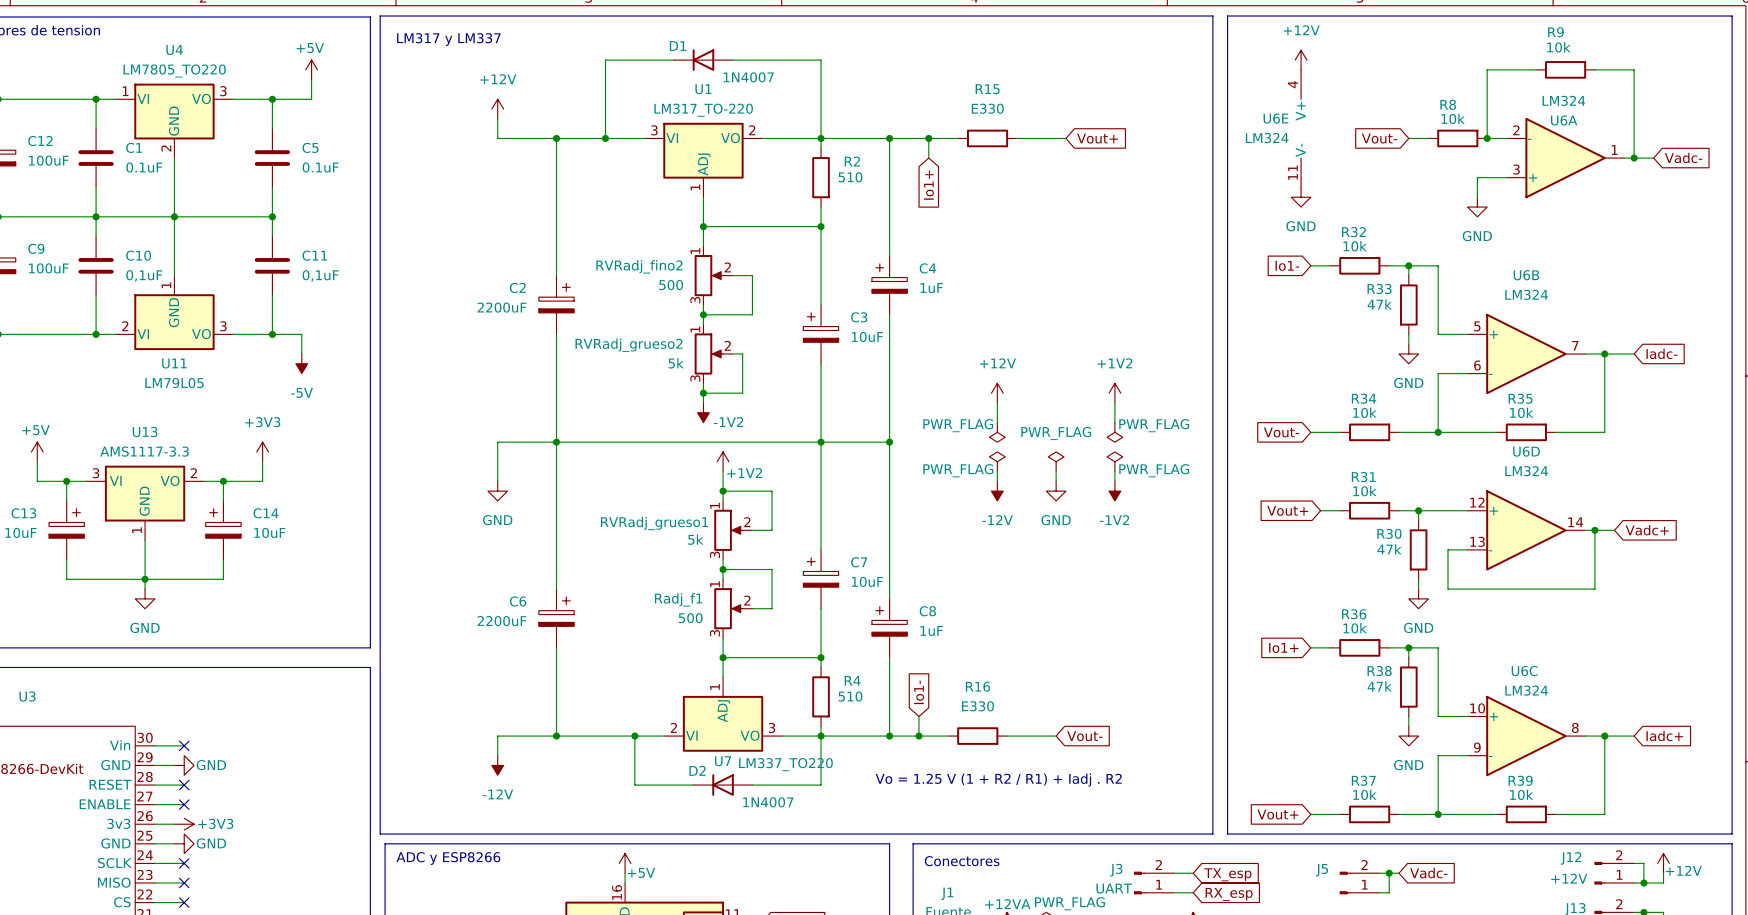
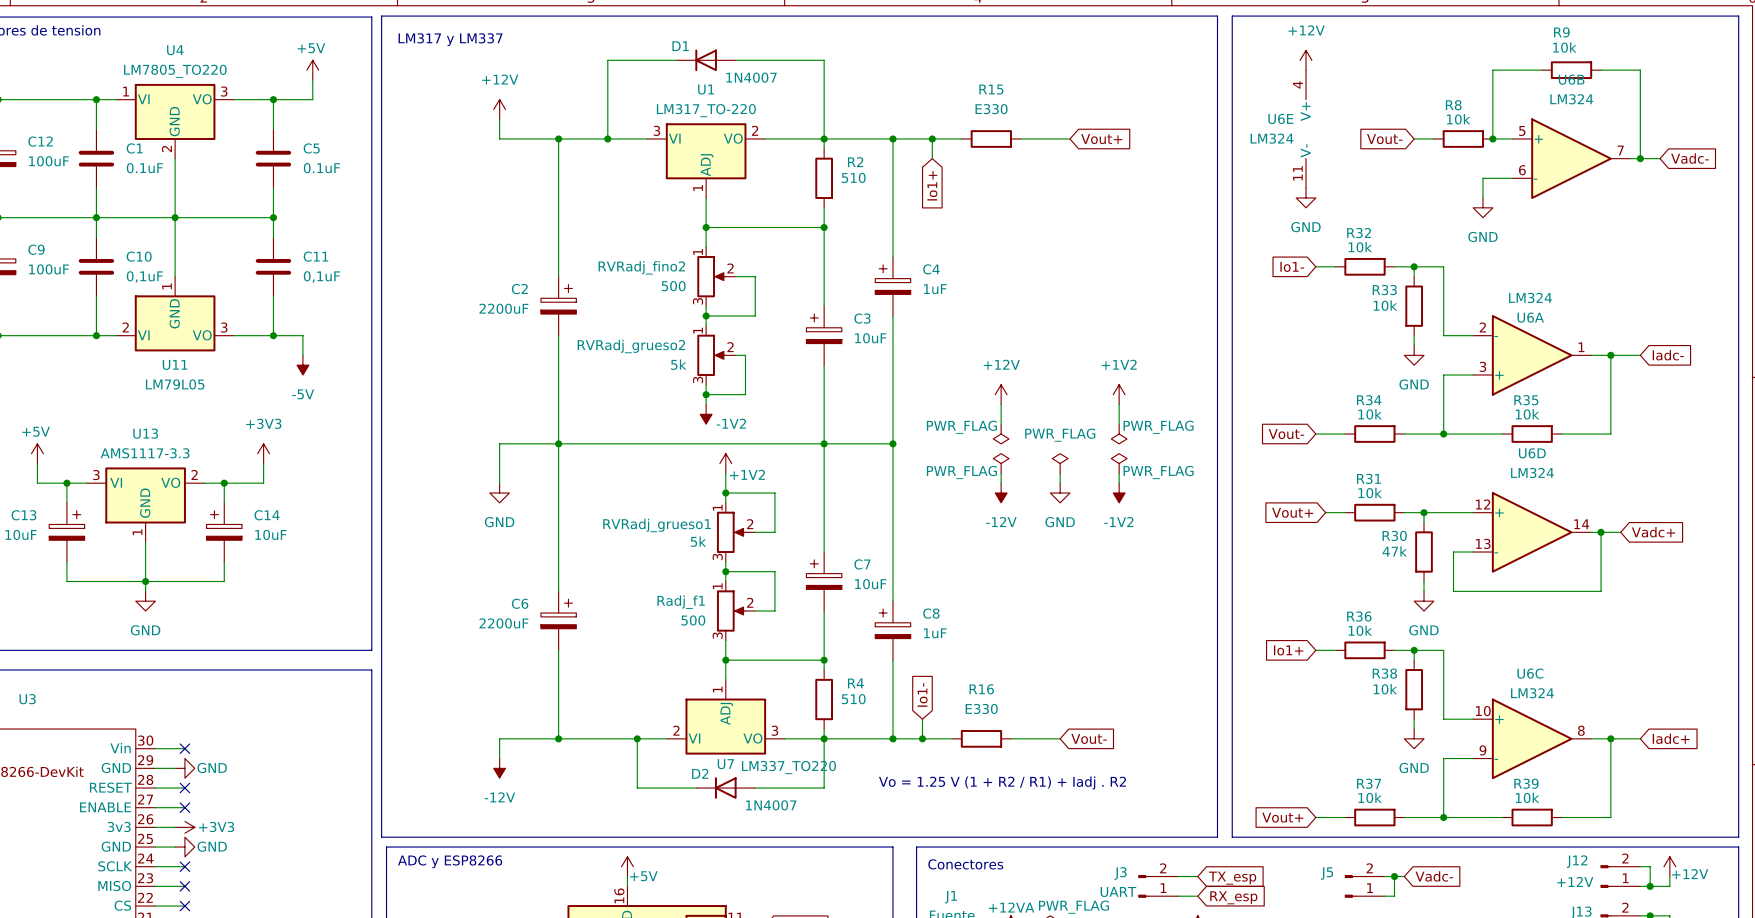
U6A position: (1565, 158) -> (1532, 355)
R33 value: 47k (1379, 304) -> 10k (1385, 305)
U6B position: (1526, 353) -> (1571, 158)
R38 value: 47k (1379, 686) -> 10k (1385, 689)

